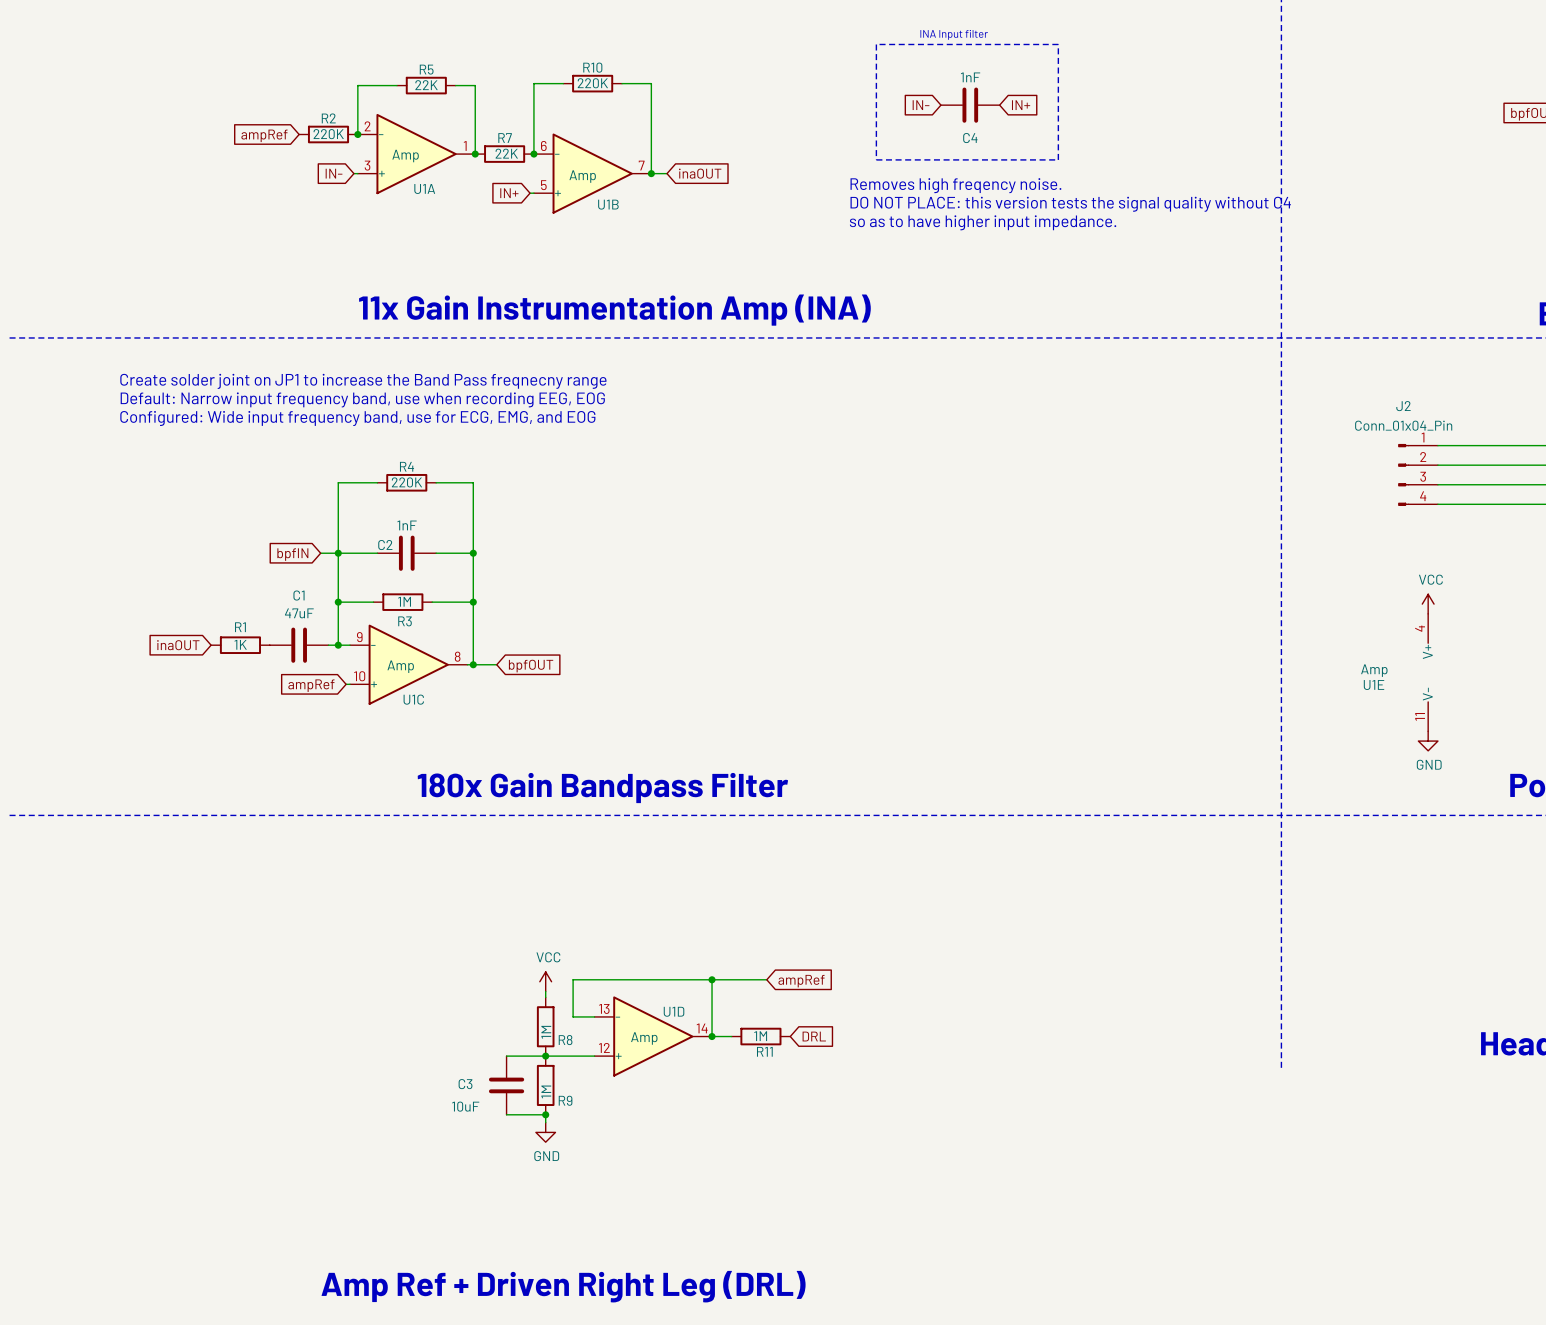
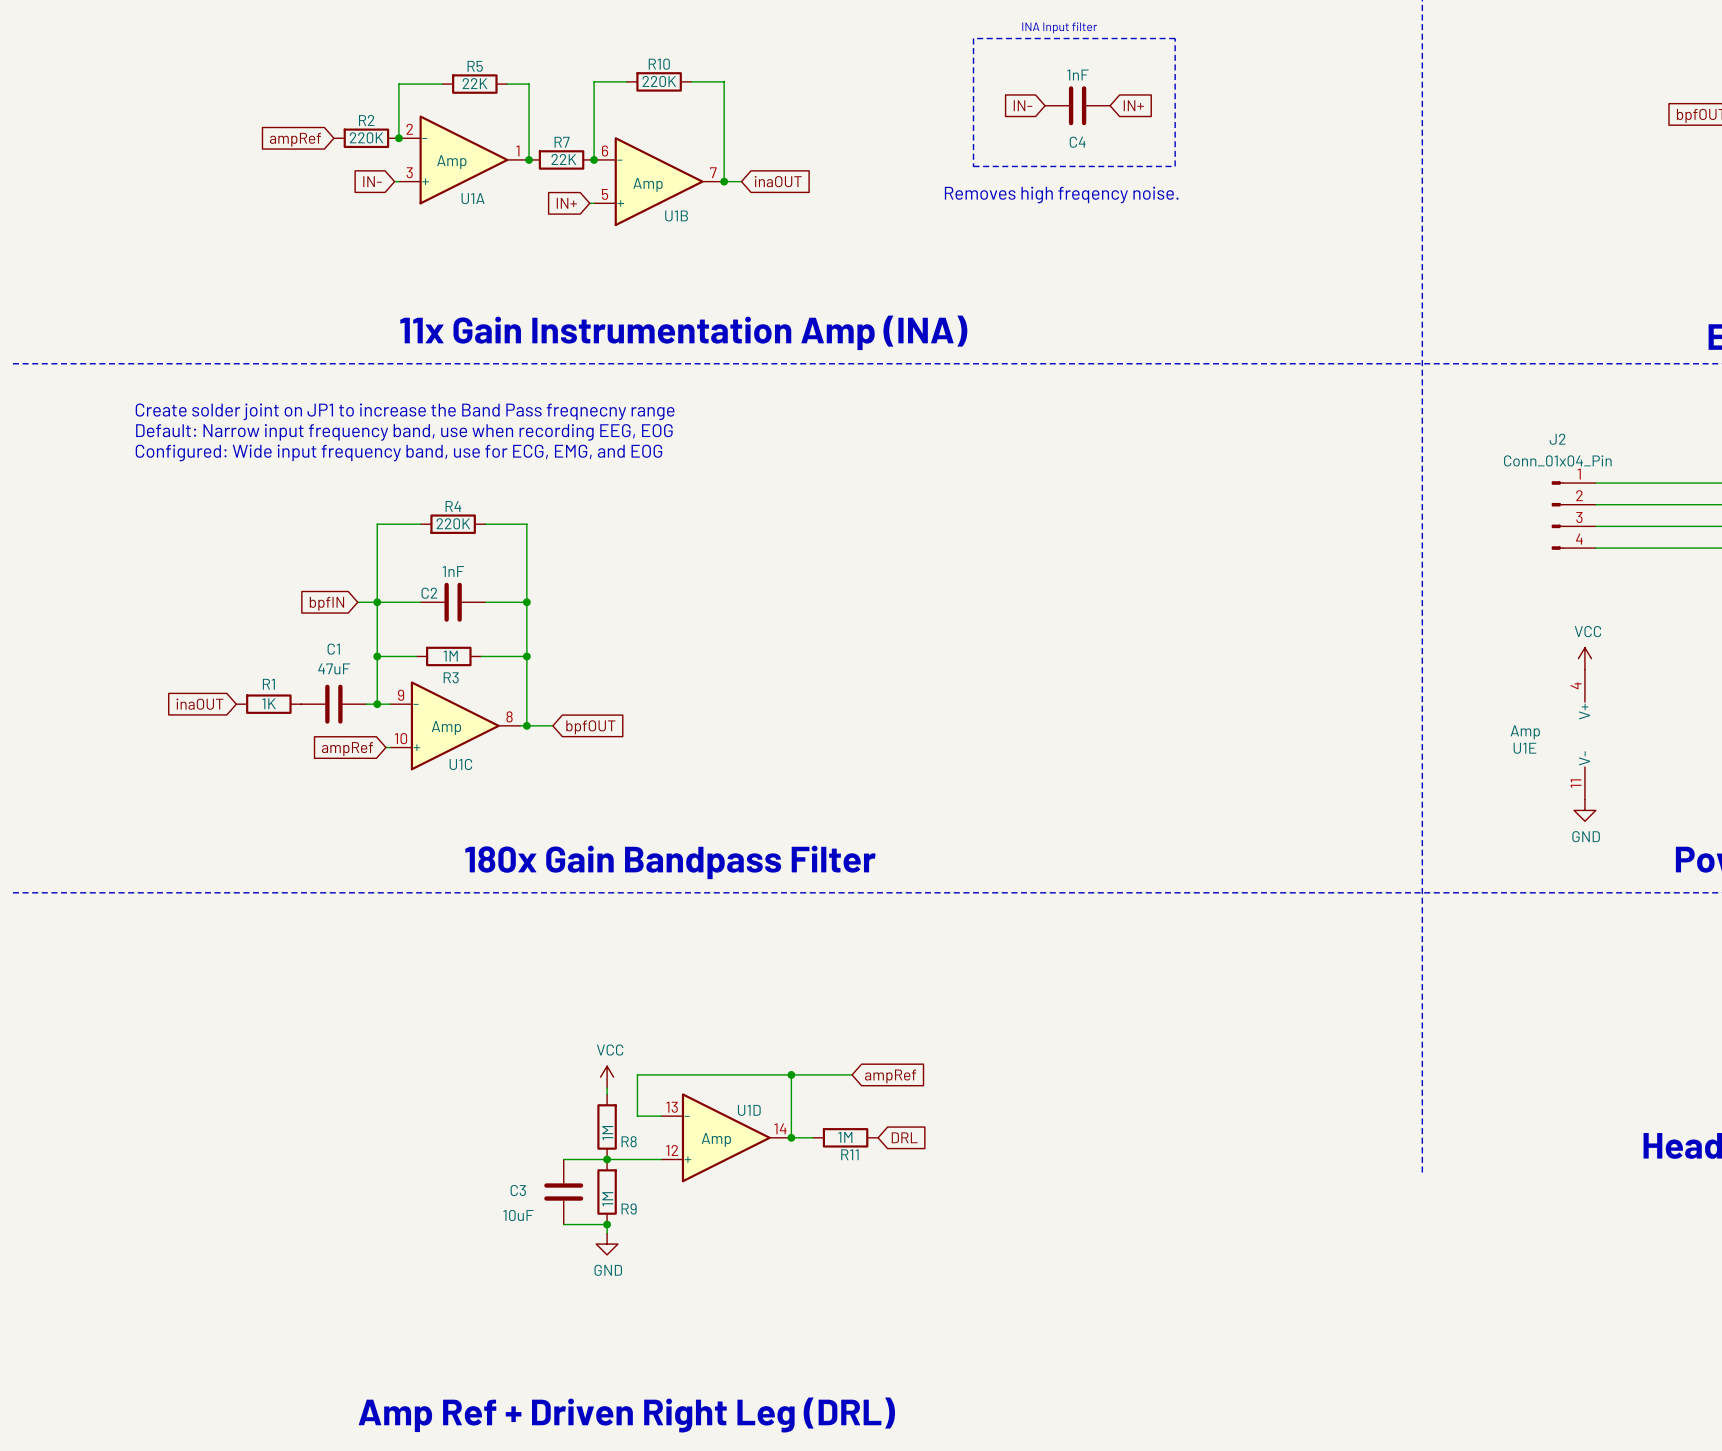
text: DO NOT PLACE: this version tests the signal quality without C4 (1070, 204) -> none
text: so as to have higher input impedance. (983, 222) -> none

